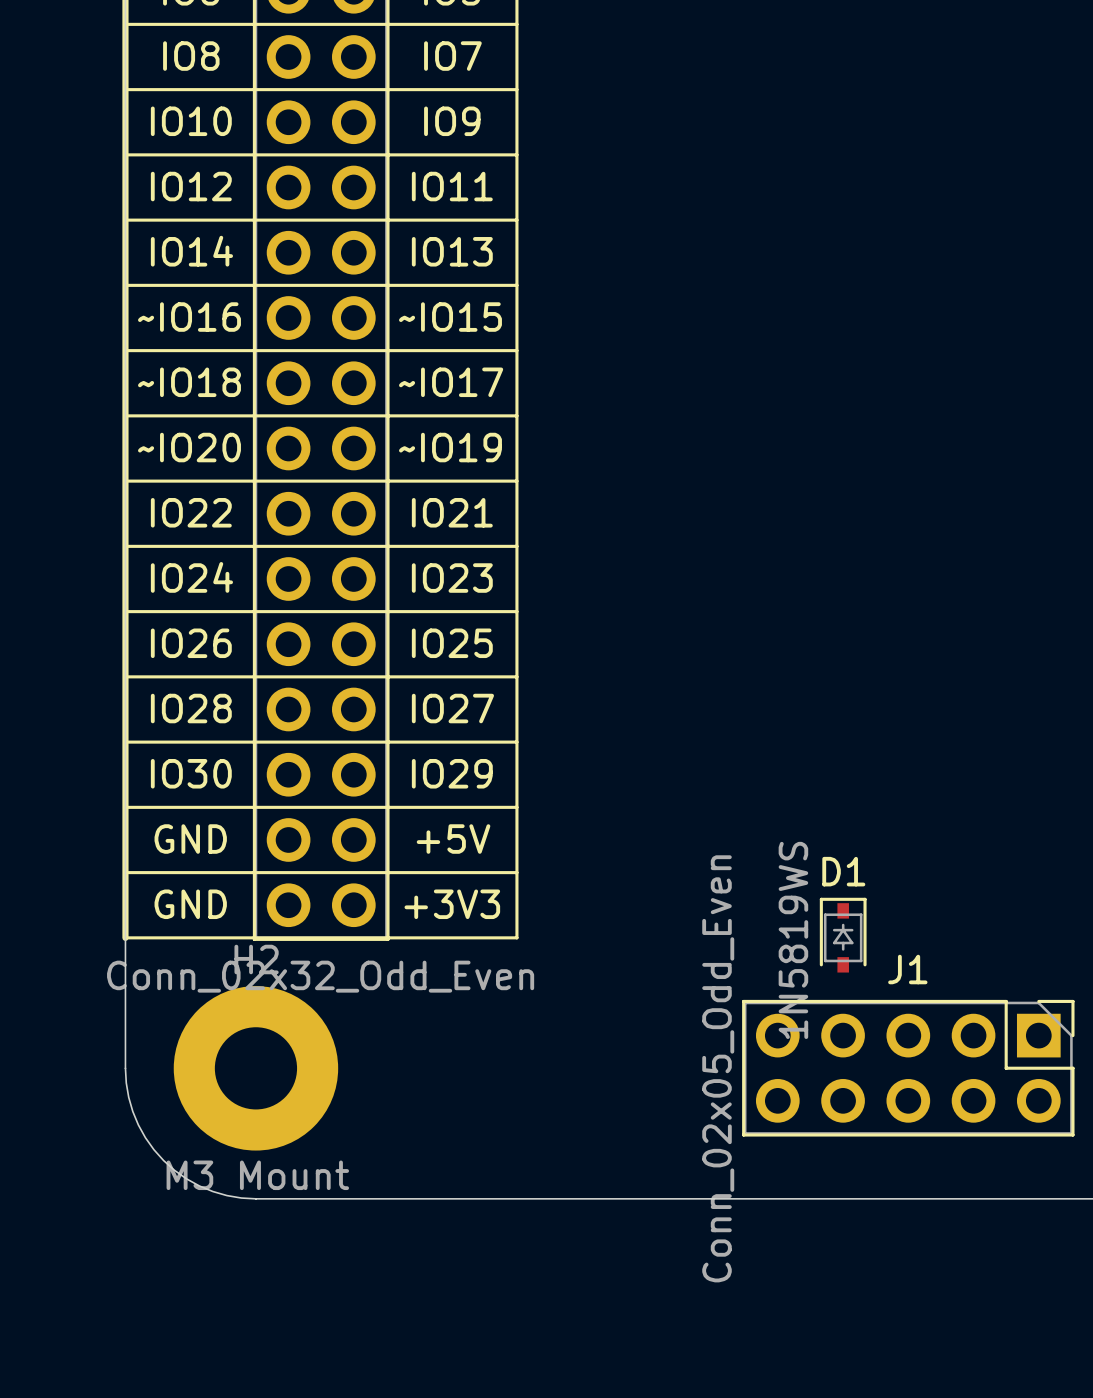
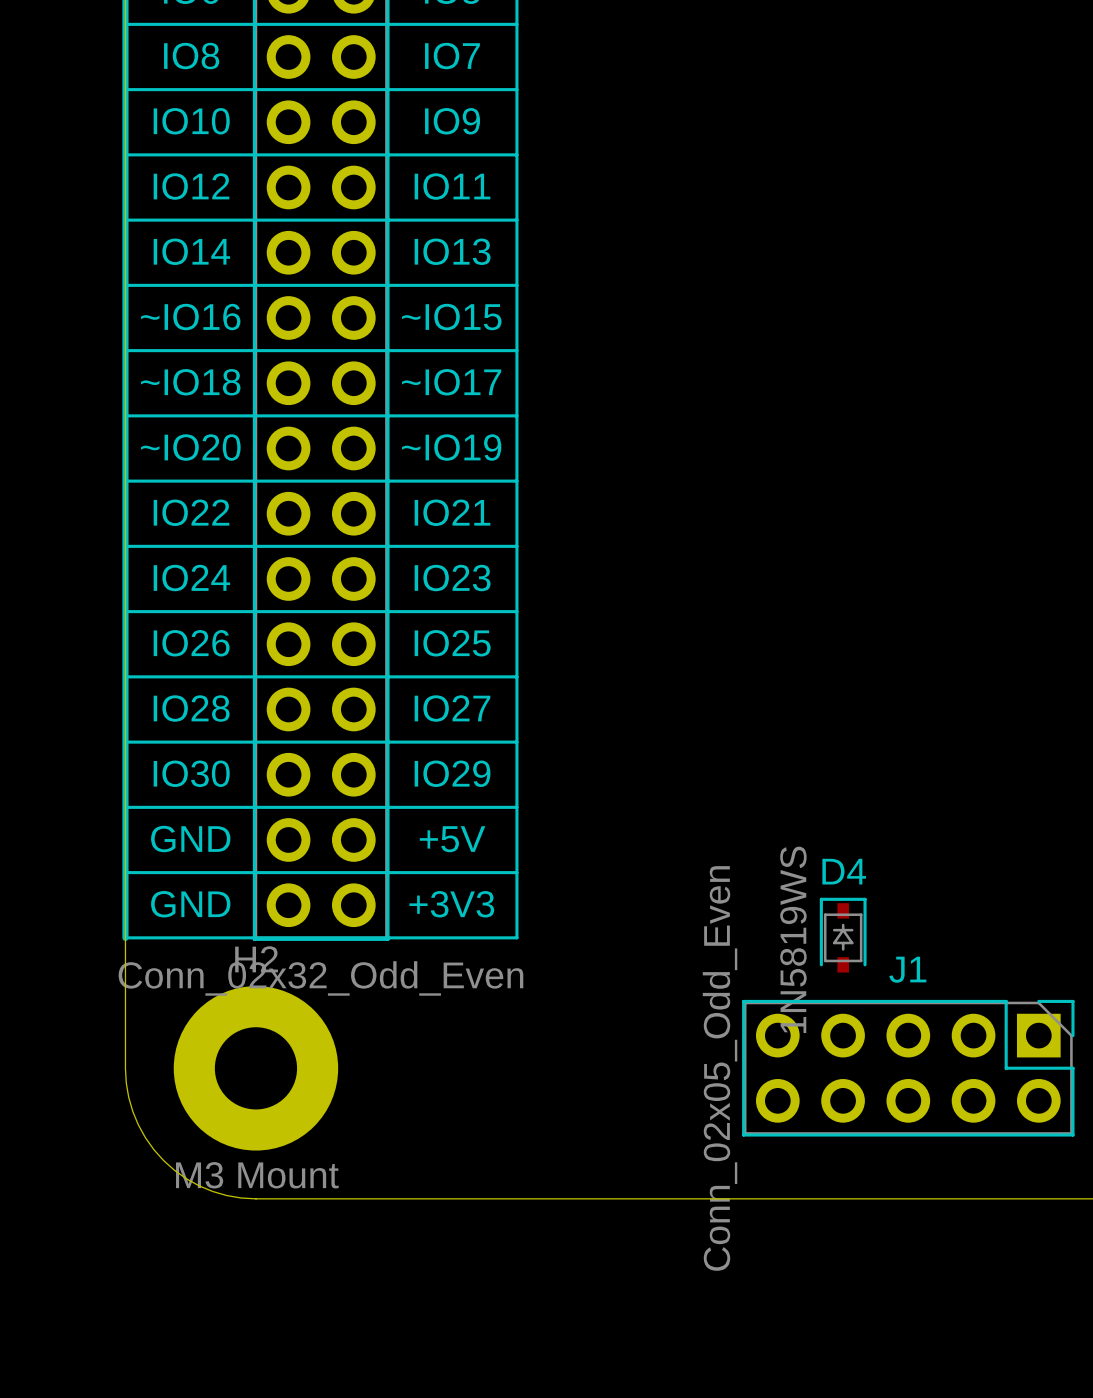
D1 name: D1 (843, 871) -> D4 (844, 871)

